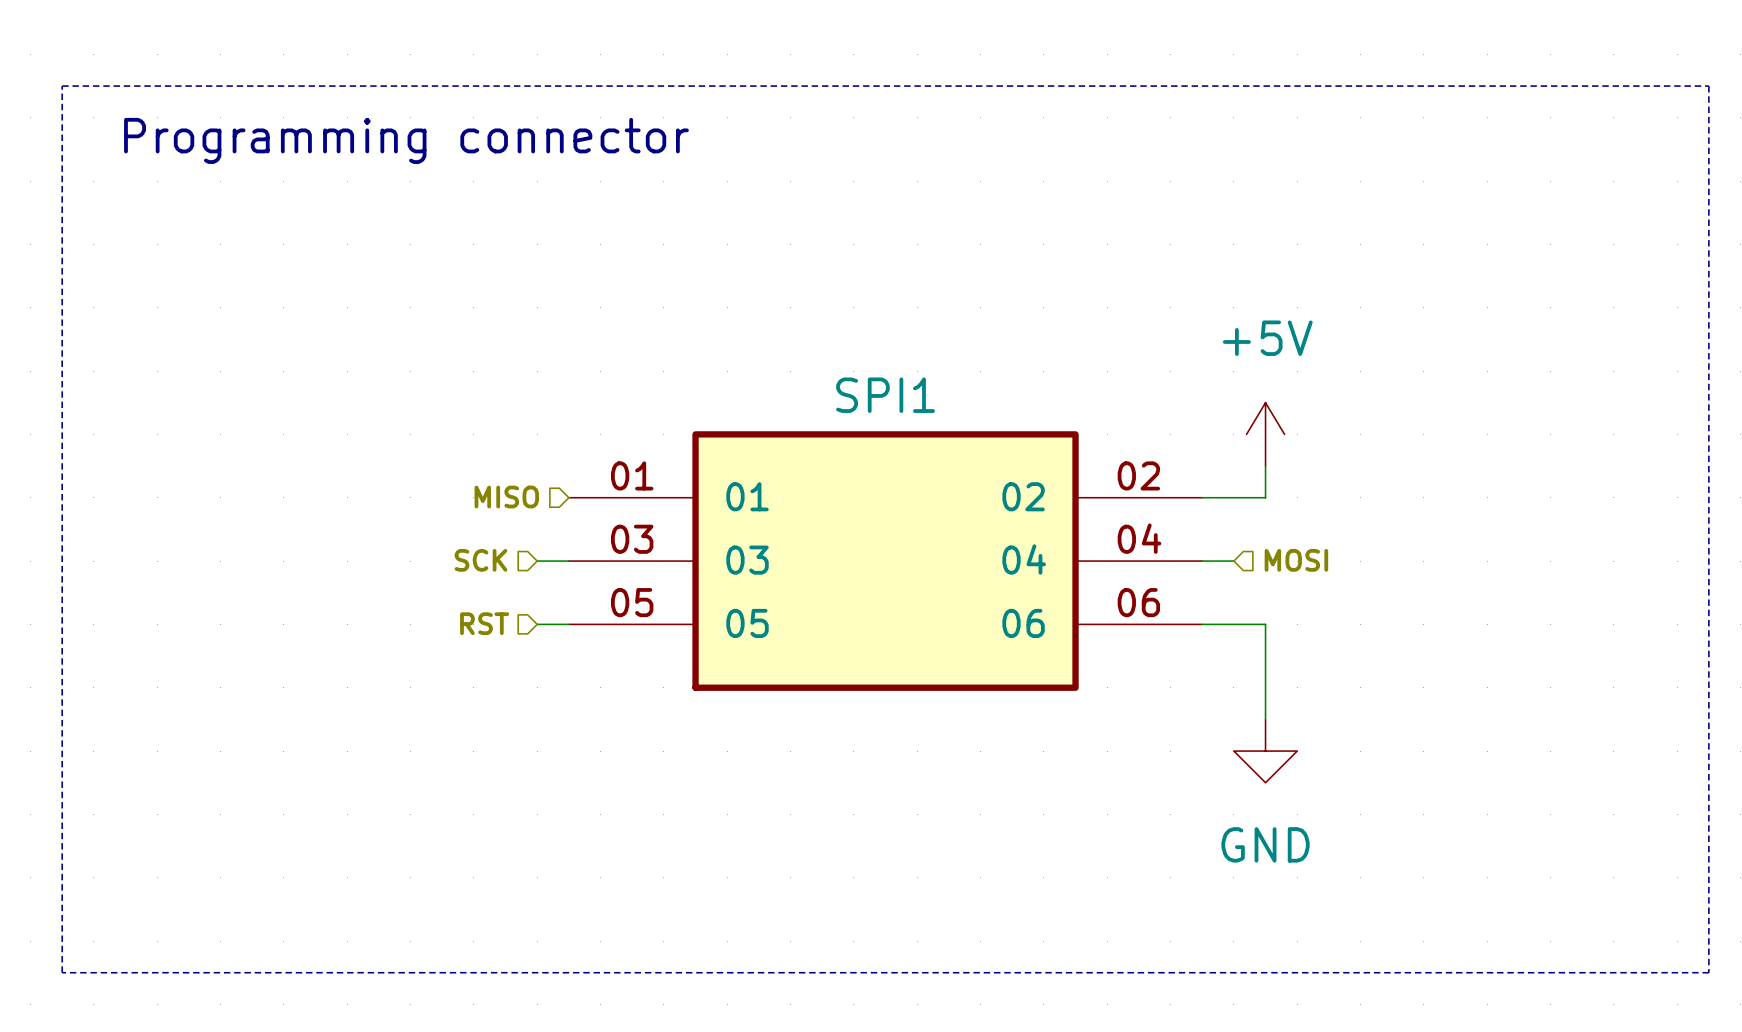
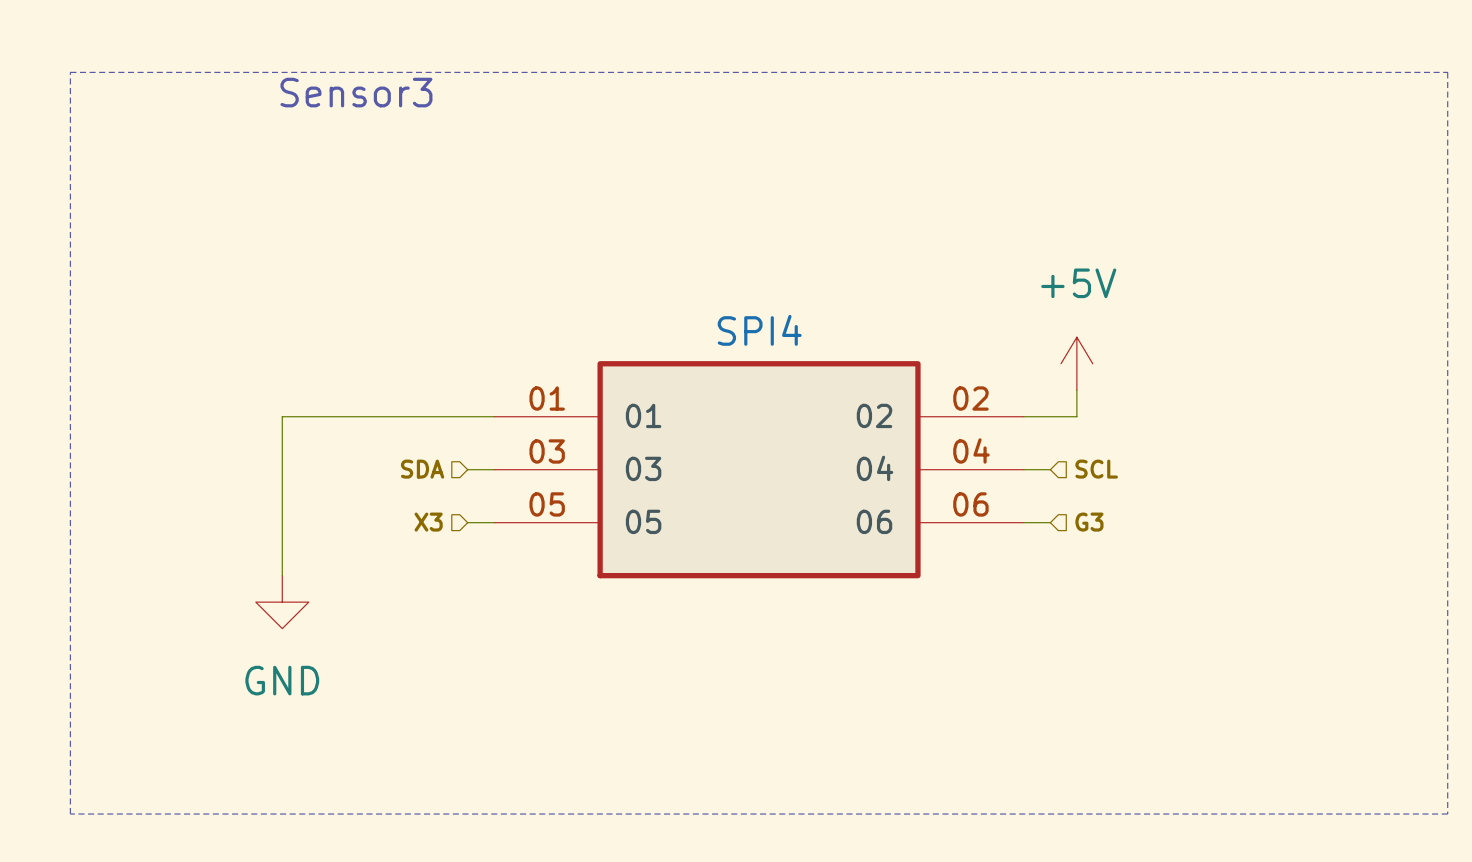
text: none -> Sensor3 (356, 92)
text: Programming connector (406, 140) -> none
SPI1 name: SPI1 (885, 395) -> SPI4 (759, 330)
hierarchical label: MISO (506, 497) -> none
wire: none -> (494, 416) (282, 416) (282, 575)
hierarchical label: SCK (481, 560) -> SDA (422, 469)
hierarchical label: MOSI (1296, 560) -> SCL (1096, 469)
hierarchical label: RST (484, 623) -> X3 (428, 522)
hierarchical label: none -> G3 (1089, 522)
wire: (1233, 624) (1265, 624) (1265, 719) -> none
power symbol: none -> GND (282, 602)
power symbol: GND (1265, 751) -> none

